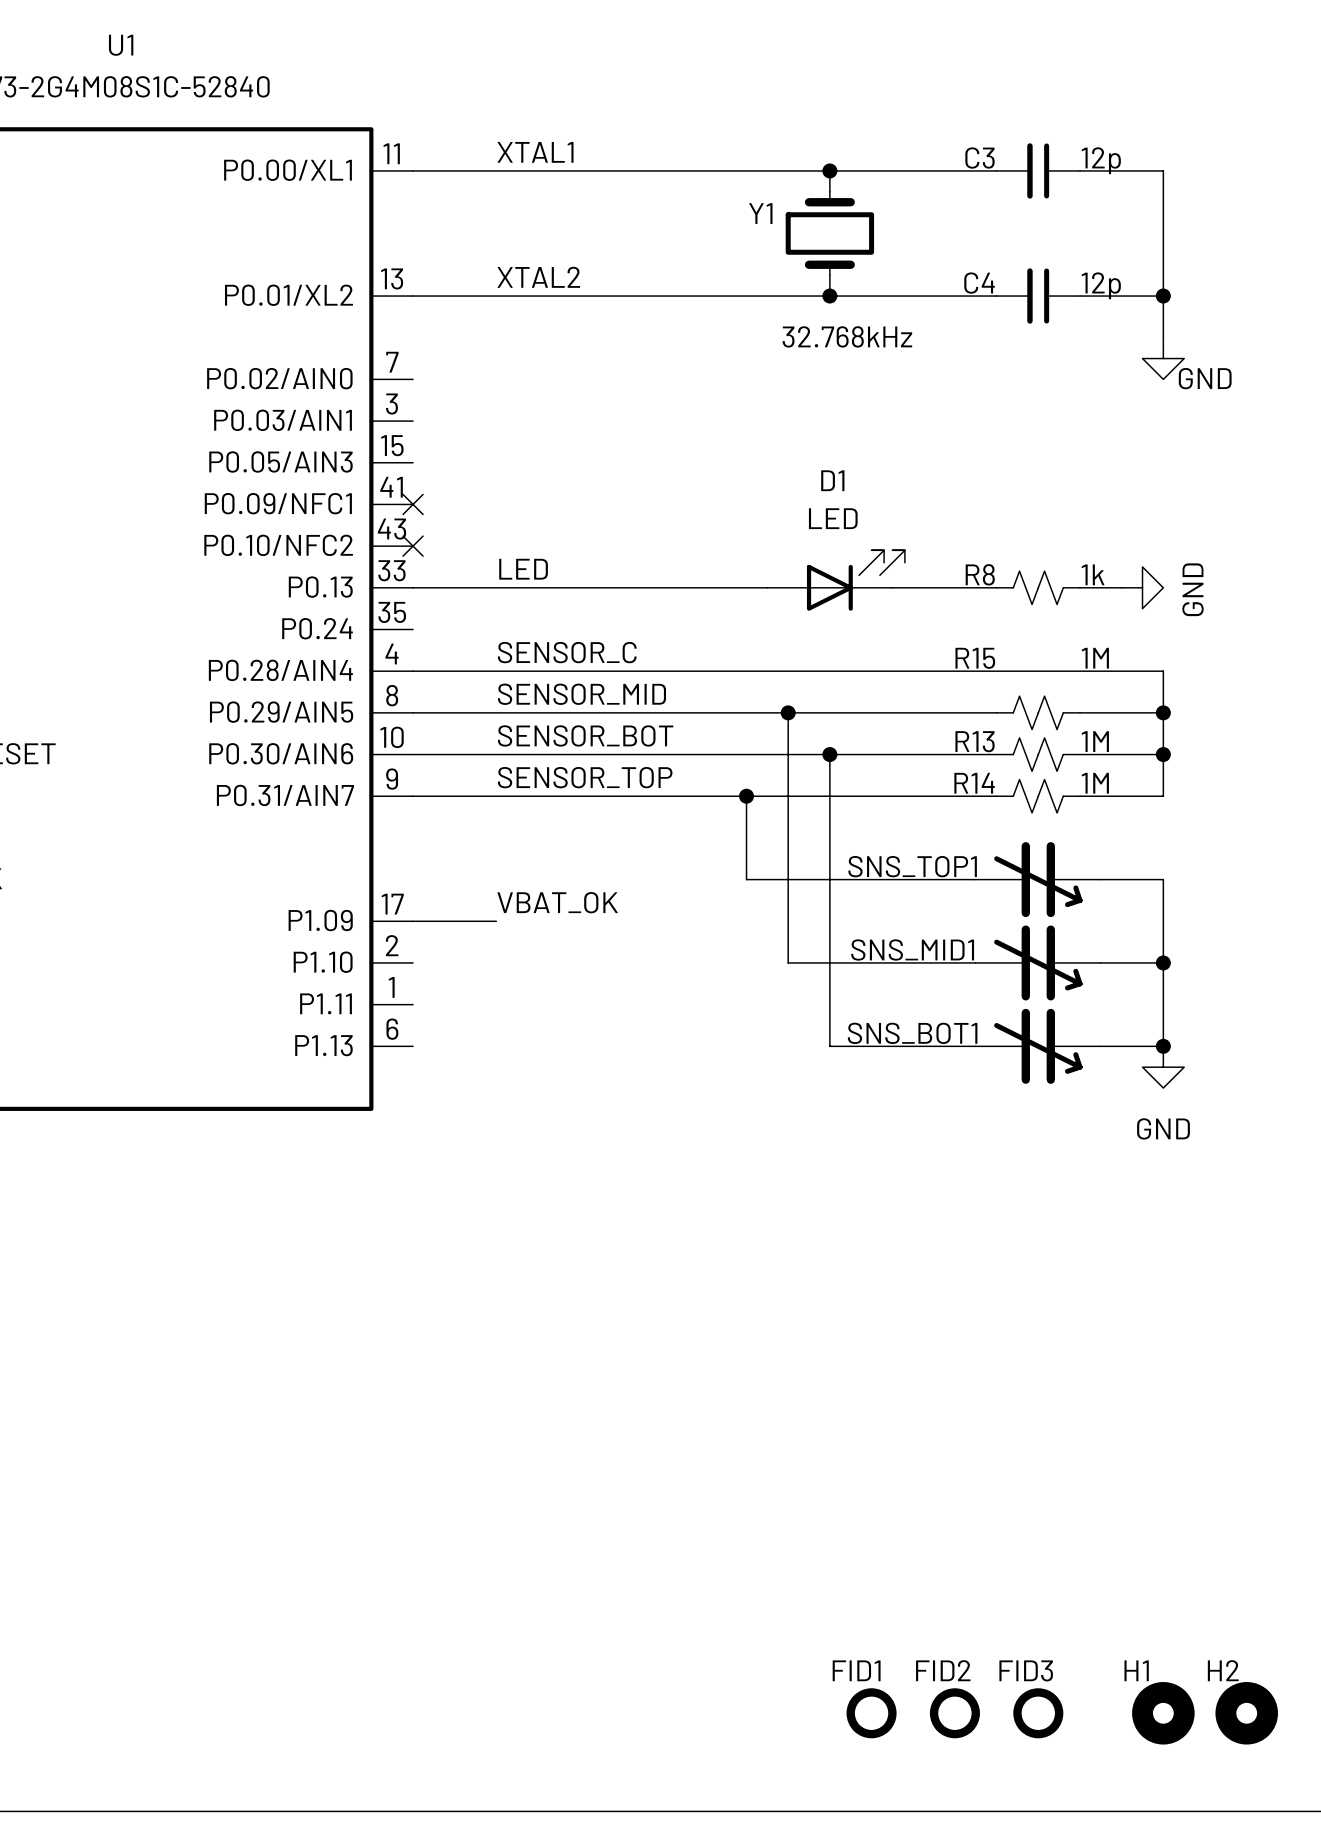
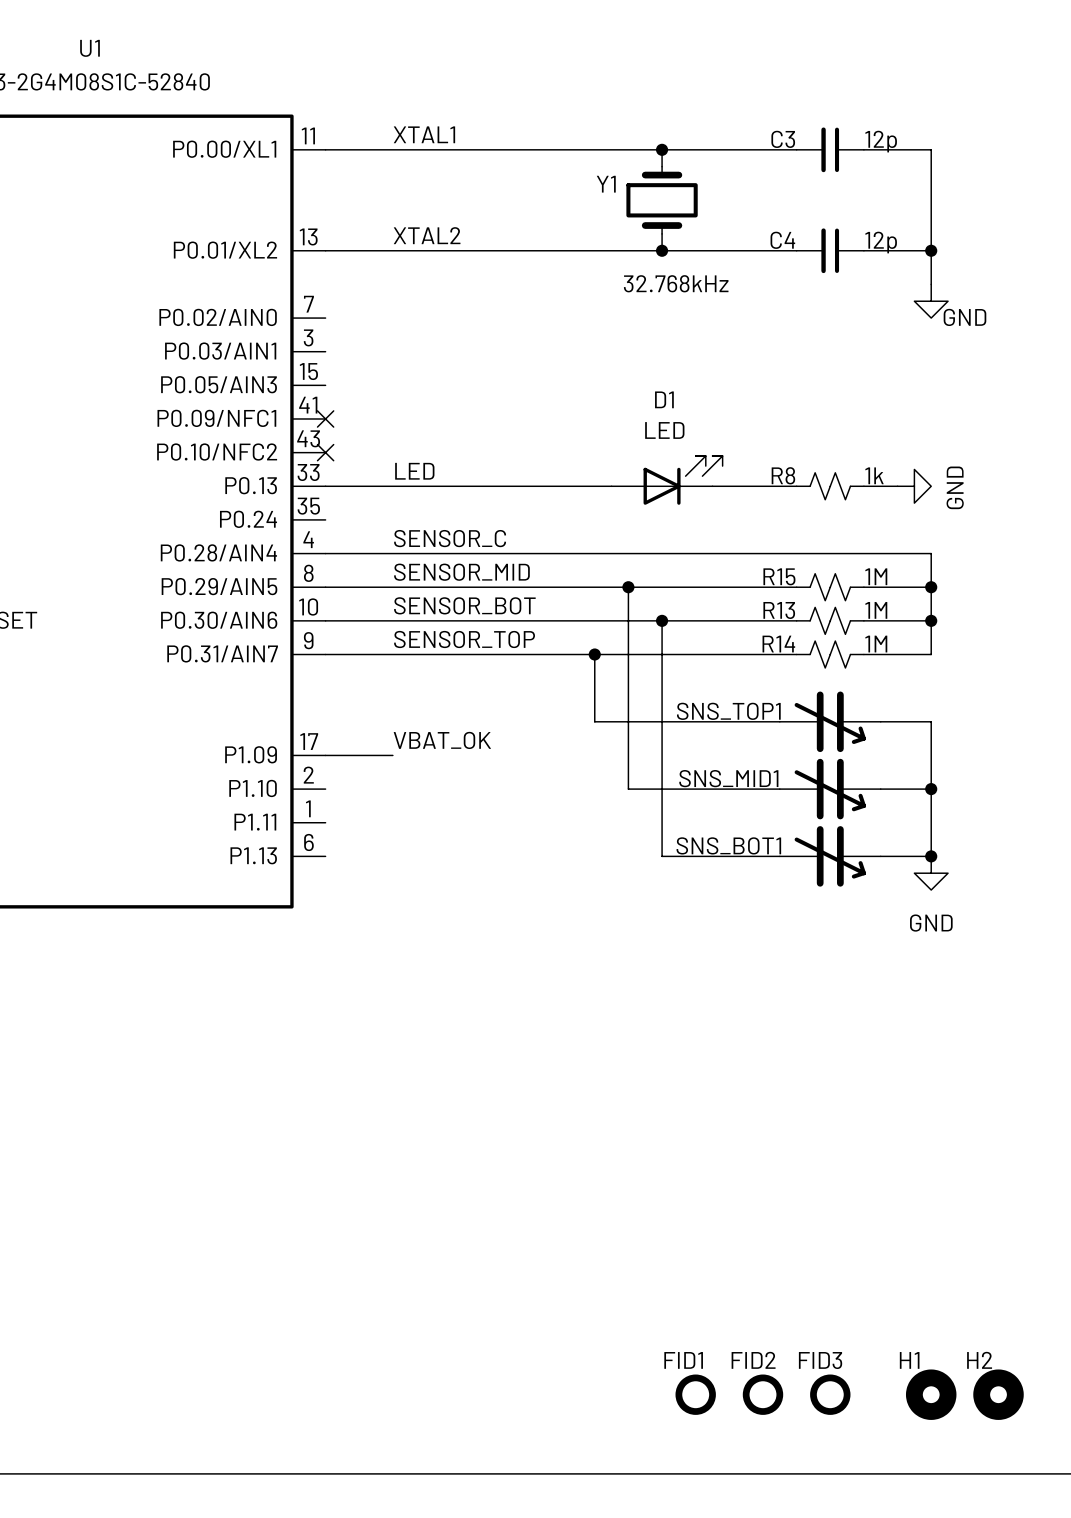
R15 name position: R15 (975, 658) -> R15 (779, 576)
R15 value position: 1M (1095, 658) -> 1M (876, 576)

